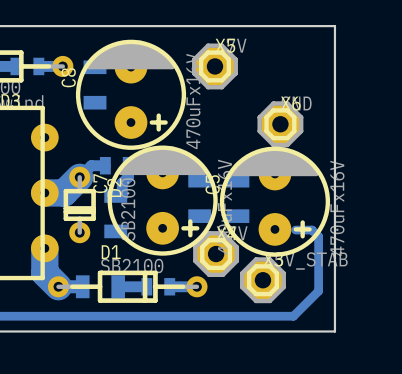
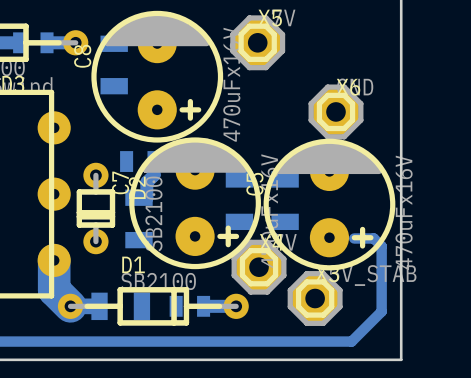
bottom track: (105, 165) (91, 165) (64, 192) (44, 192) -> none
bottom track: (118, 286) (146, 286) -> none

